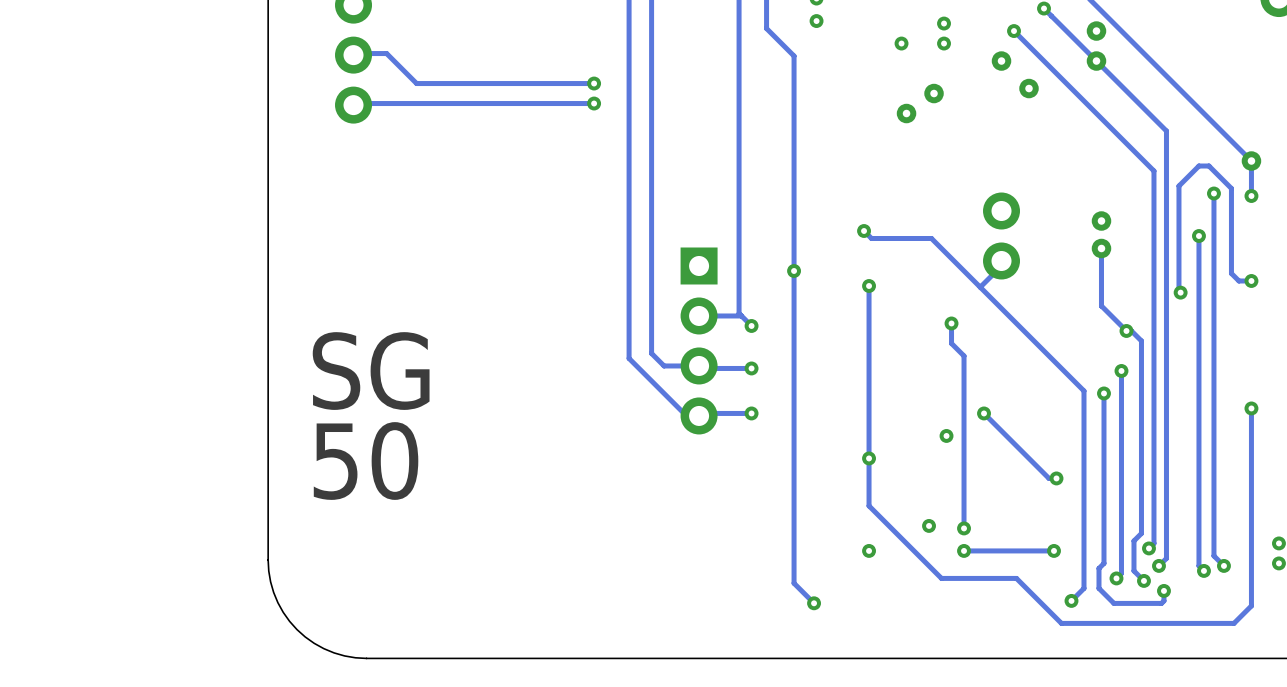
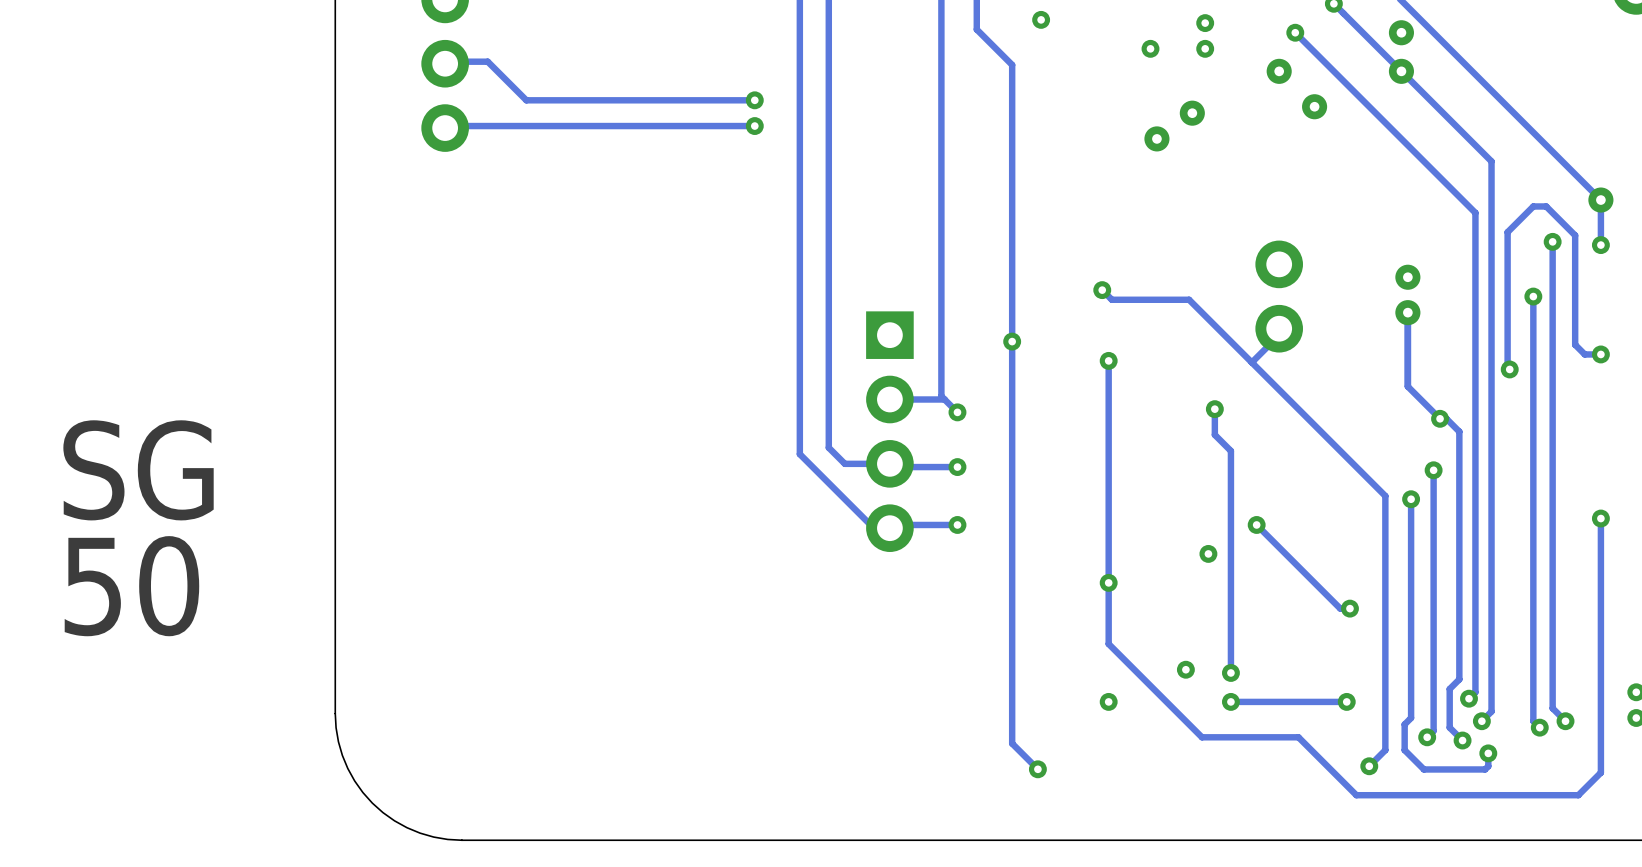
text position: SG (371, 371) -> SG (138, 470)
text position: 50 (366, 461) -> 50 (131, 586)

